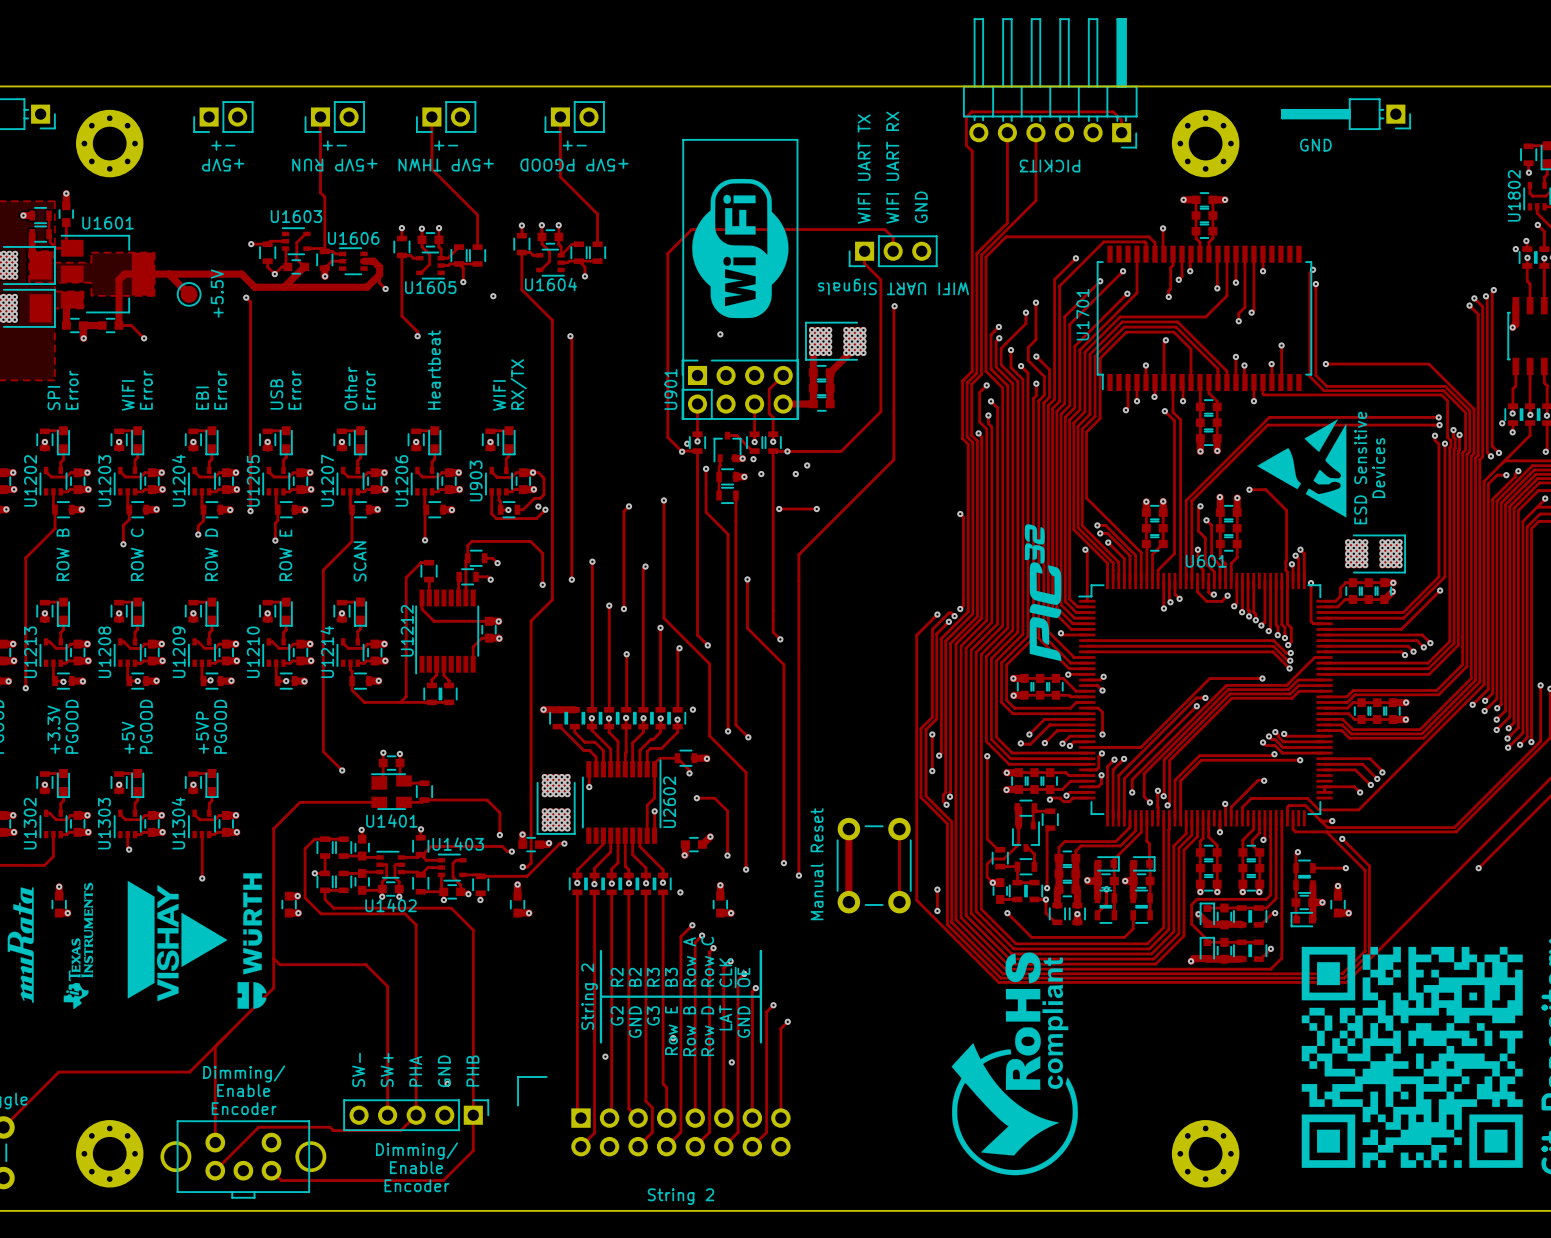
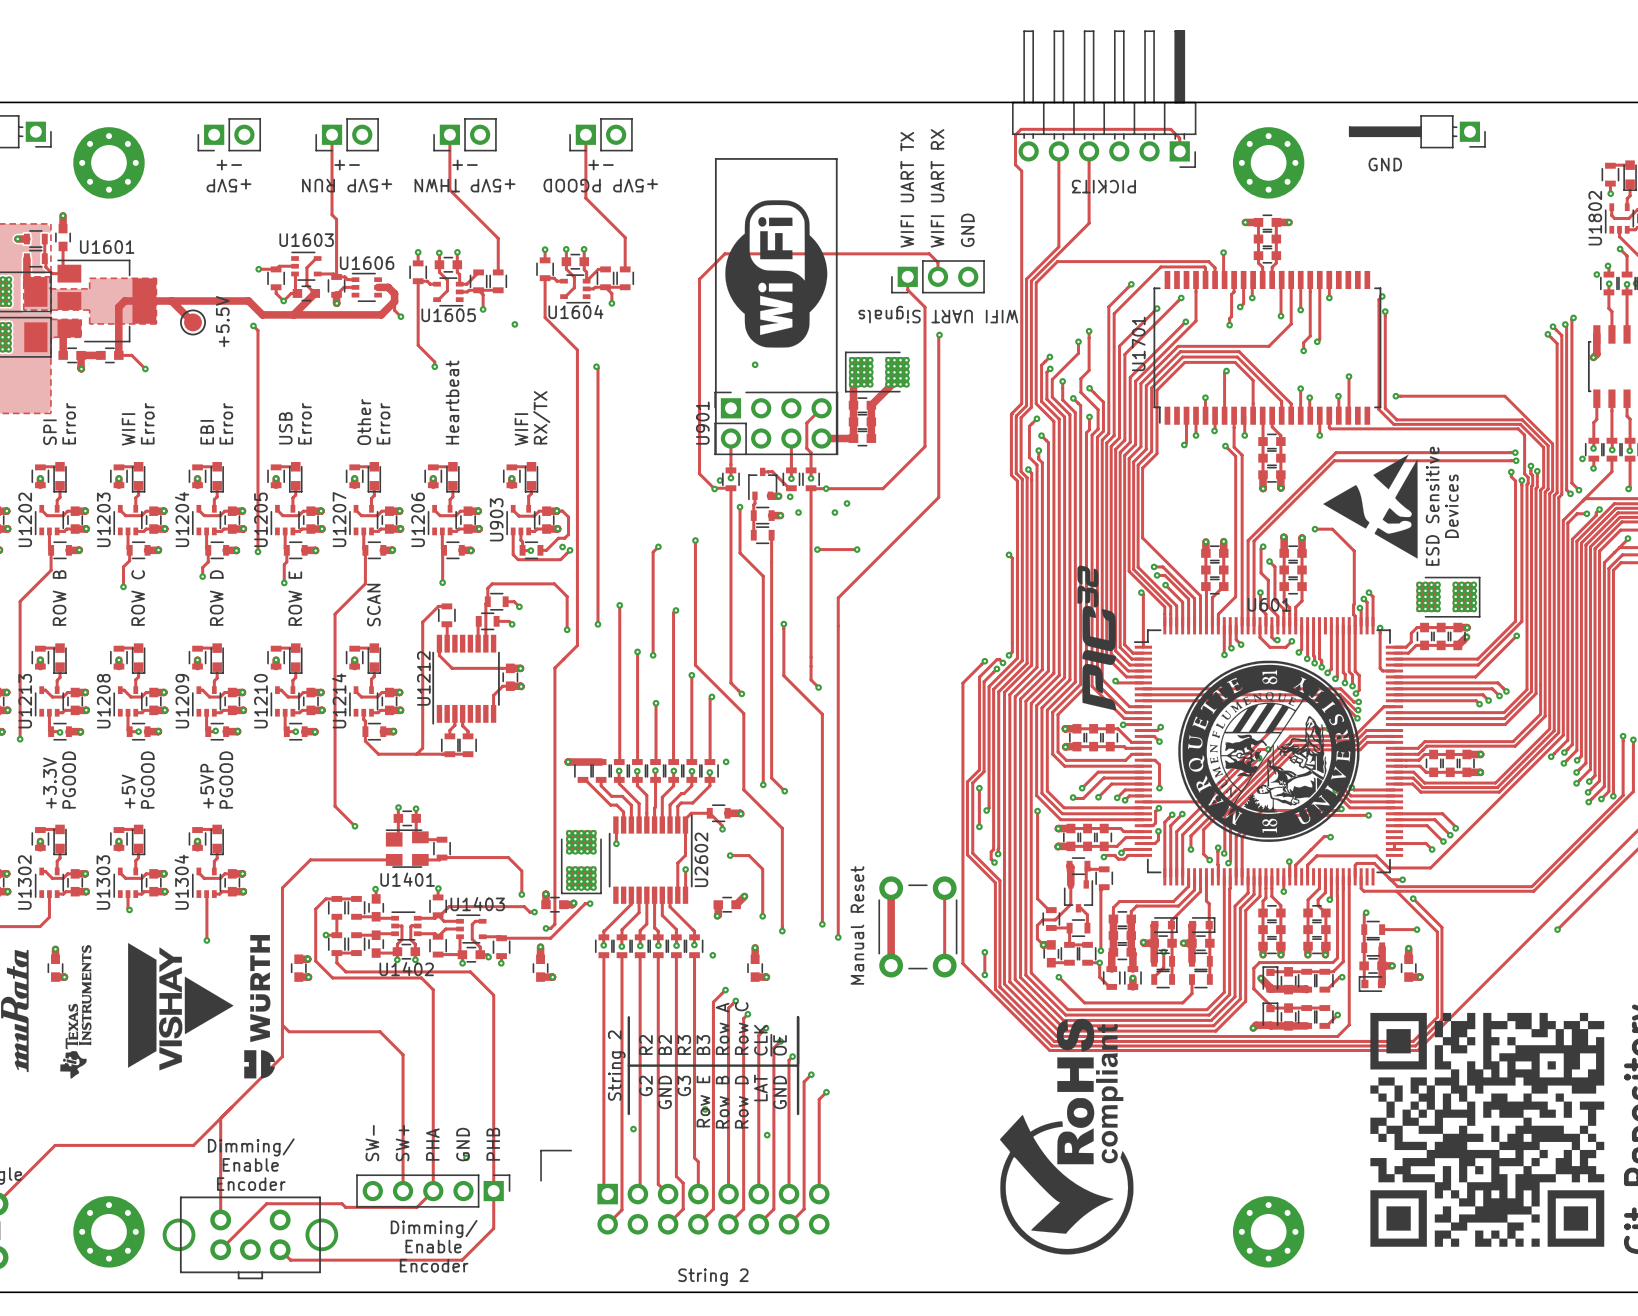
drawing: none -> [1178, 660, 1360, 842]

